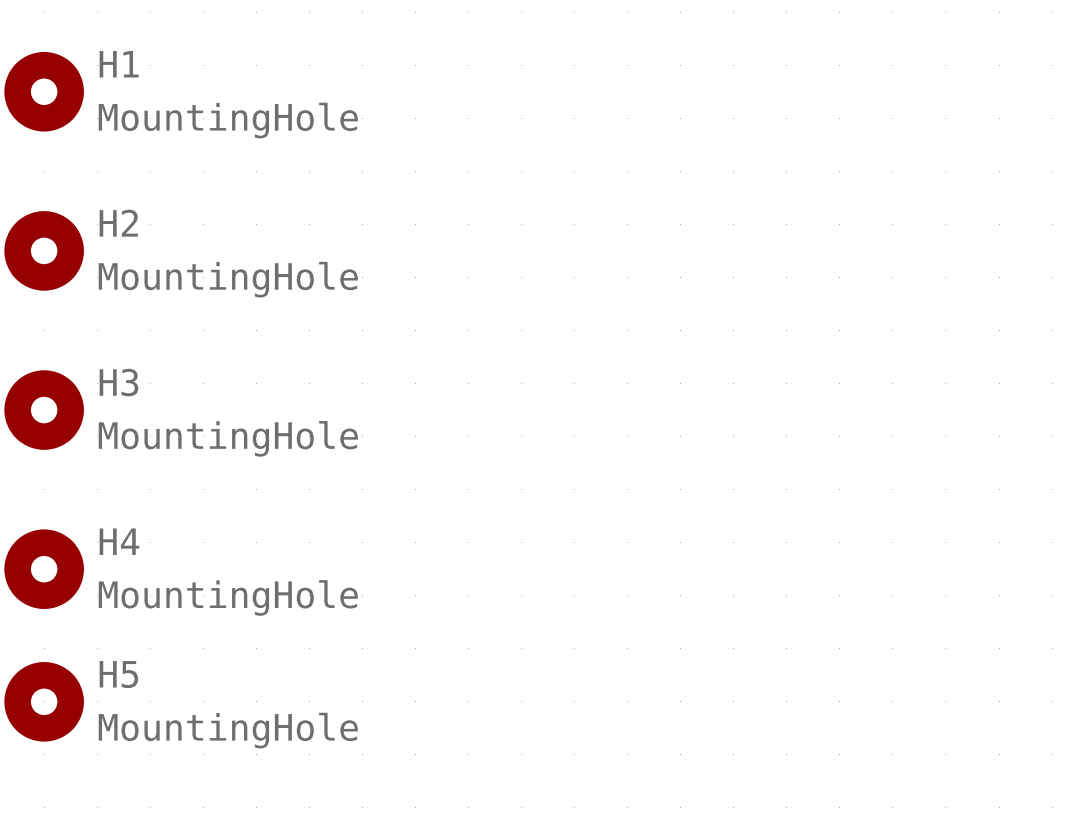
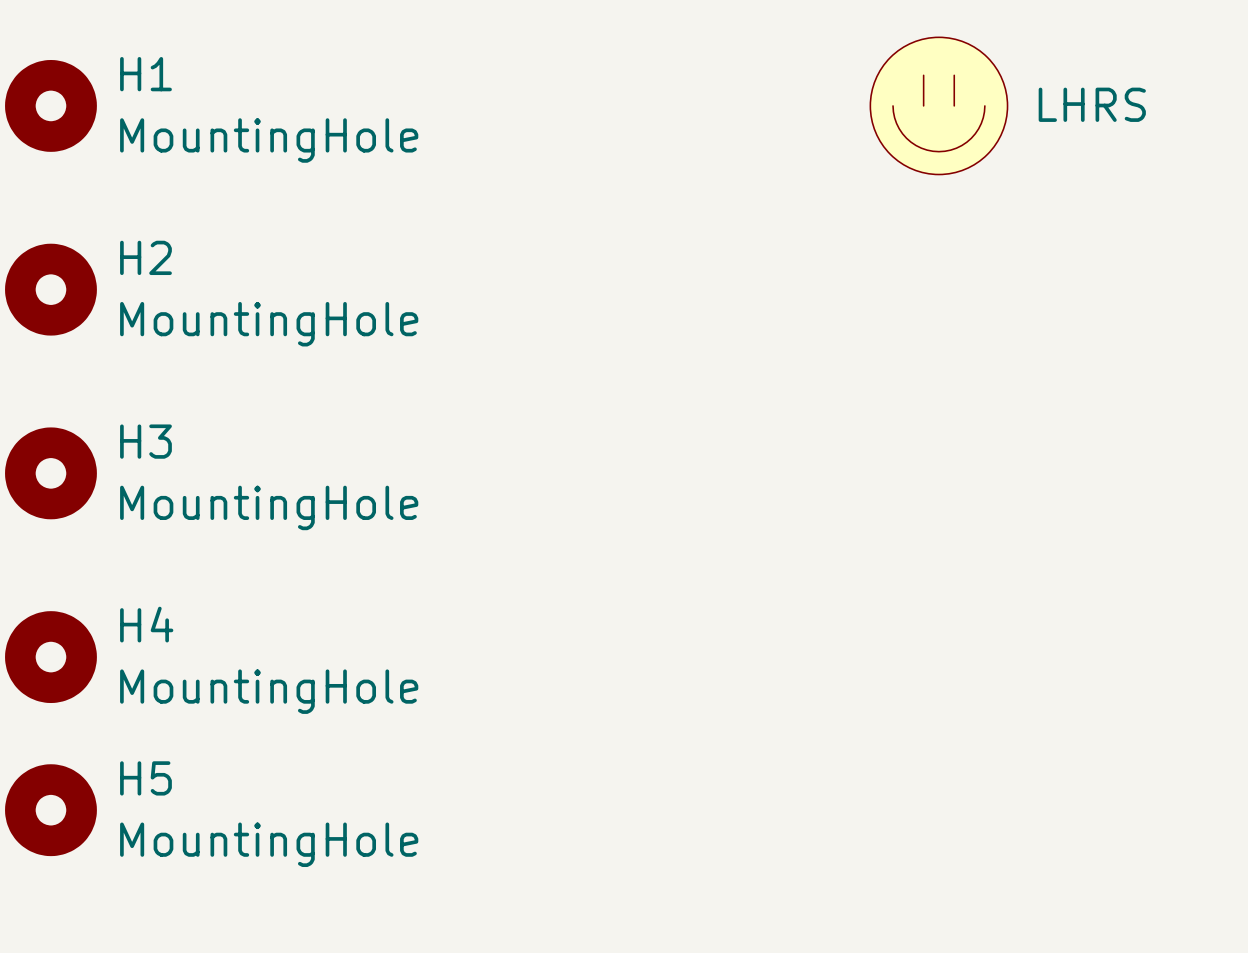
part: none -> LHRS (938, 105)

